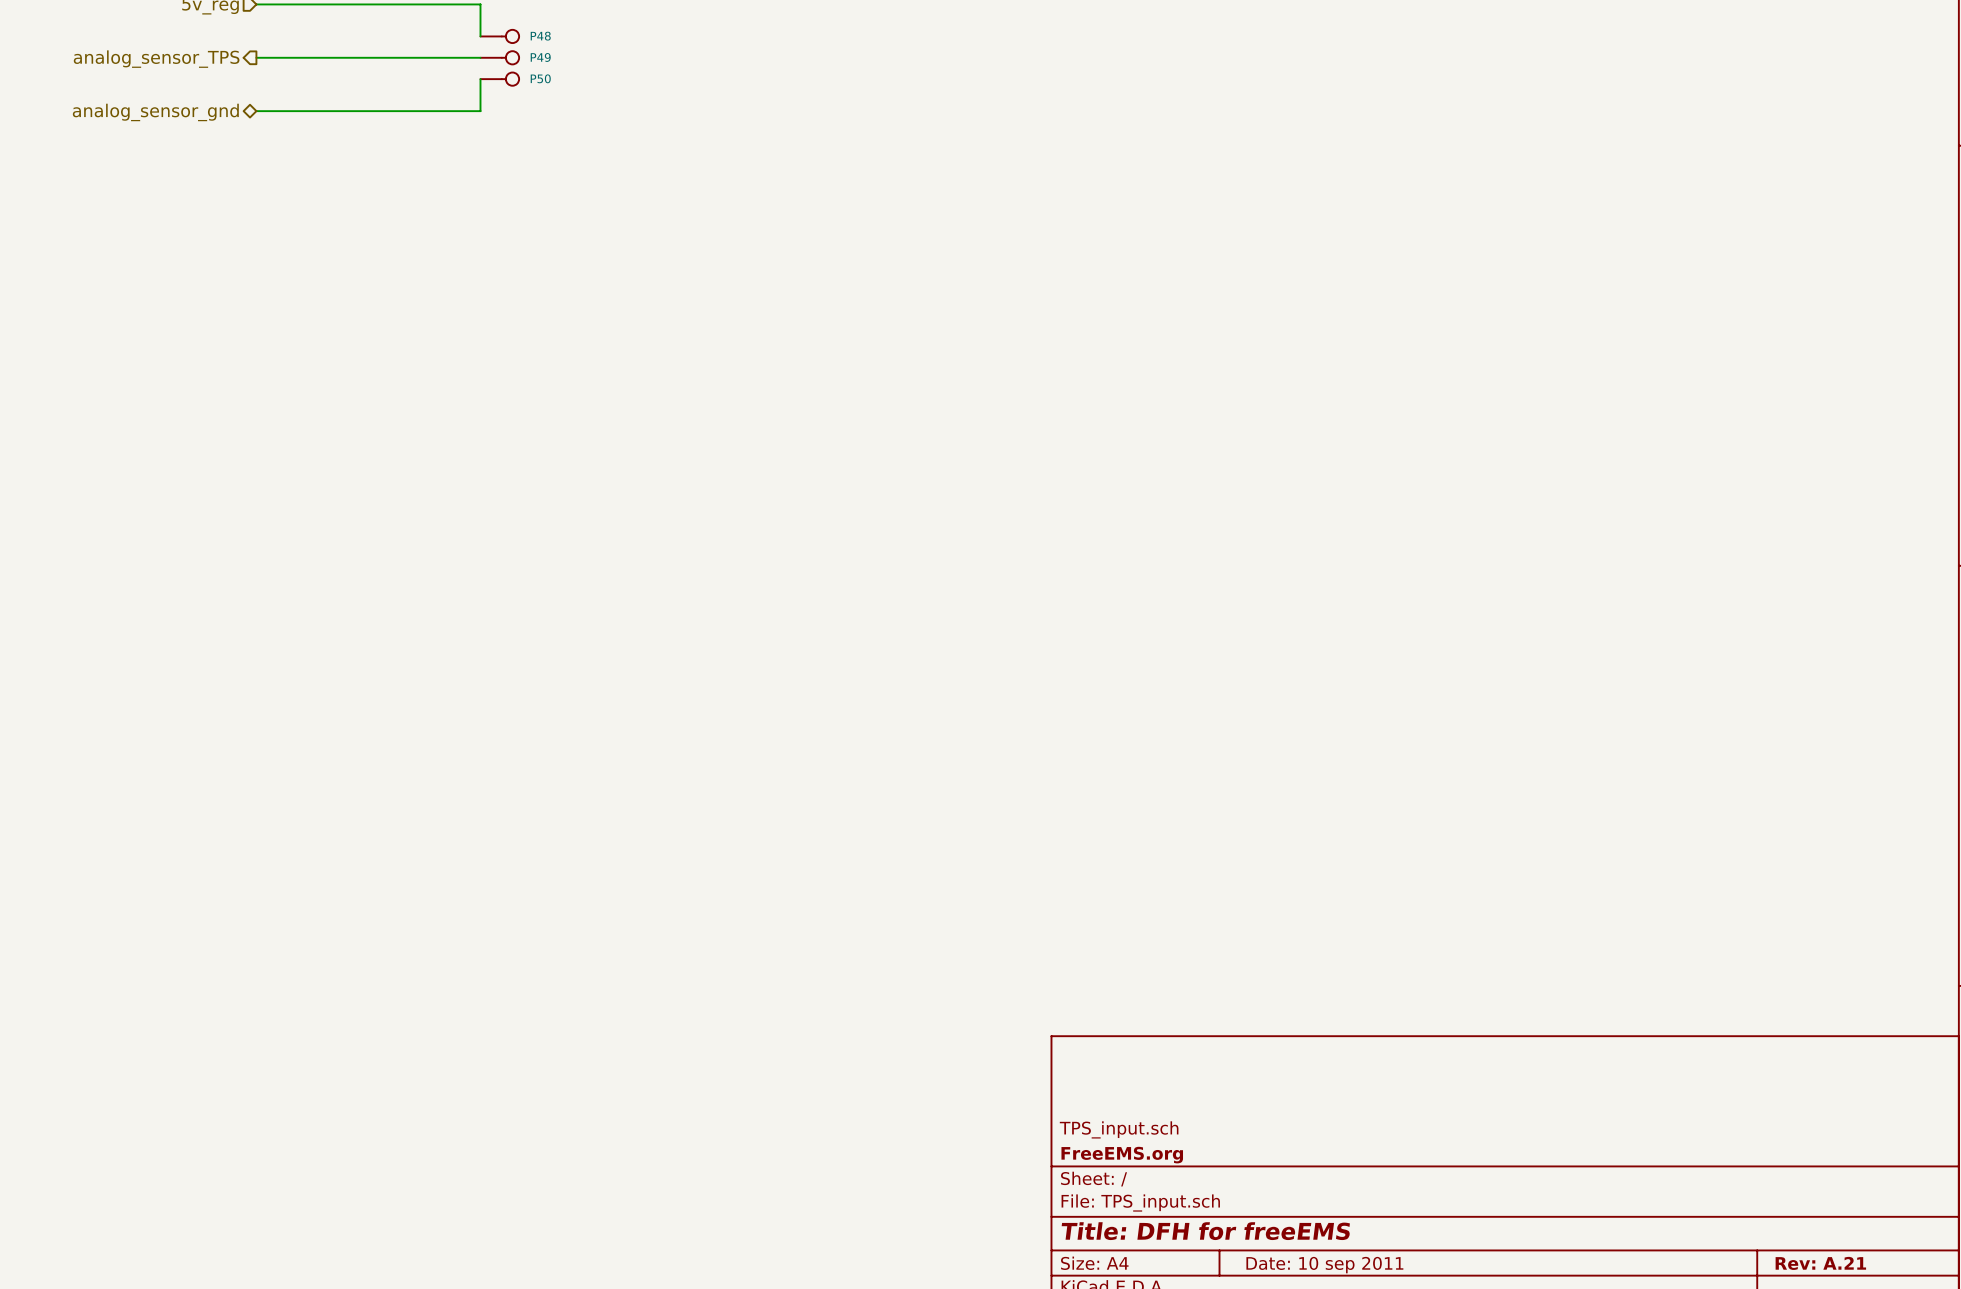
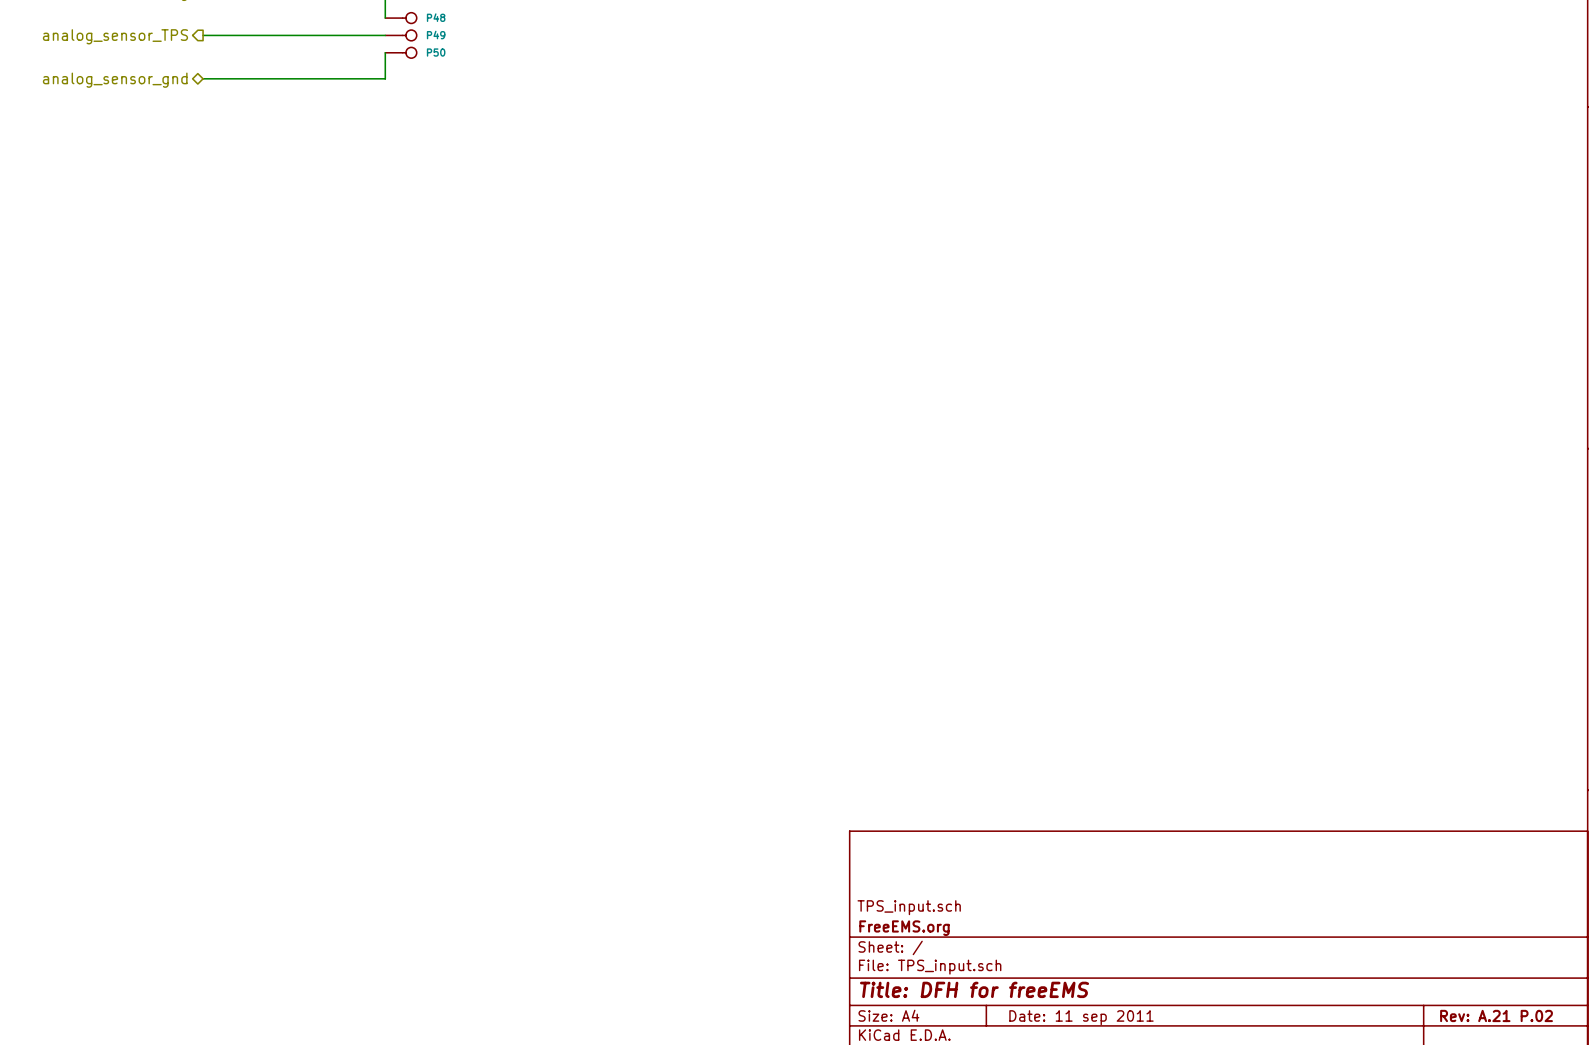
title block: Rev: A.21 (1820, 1263) -> Rev: A.21 P.02 (1496, 1015)
title block: Date: 10 sep 2011 (1324, 1265) -> Date: 11 sep 2011 (1081, 1017)

